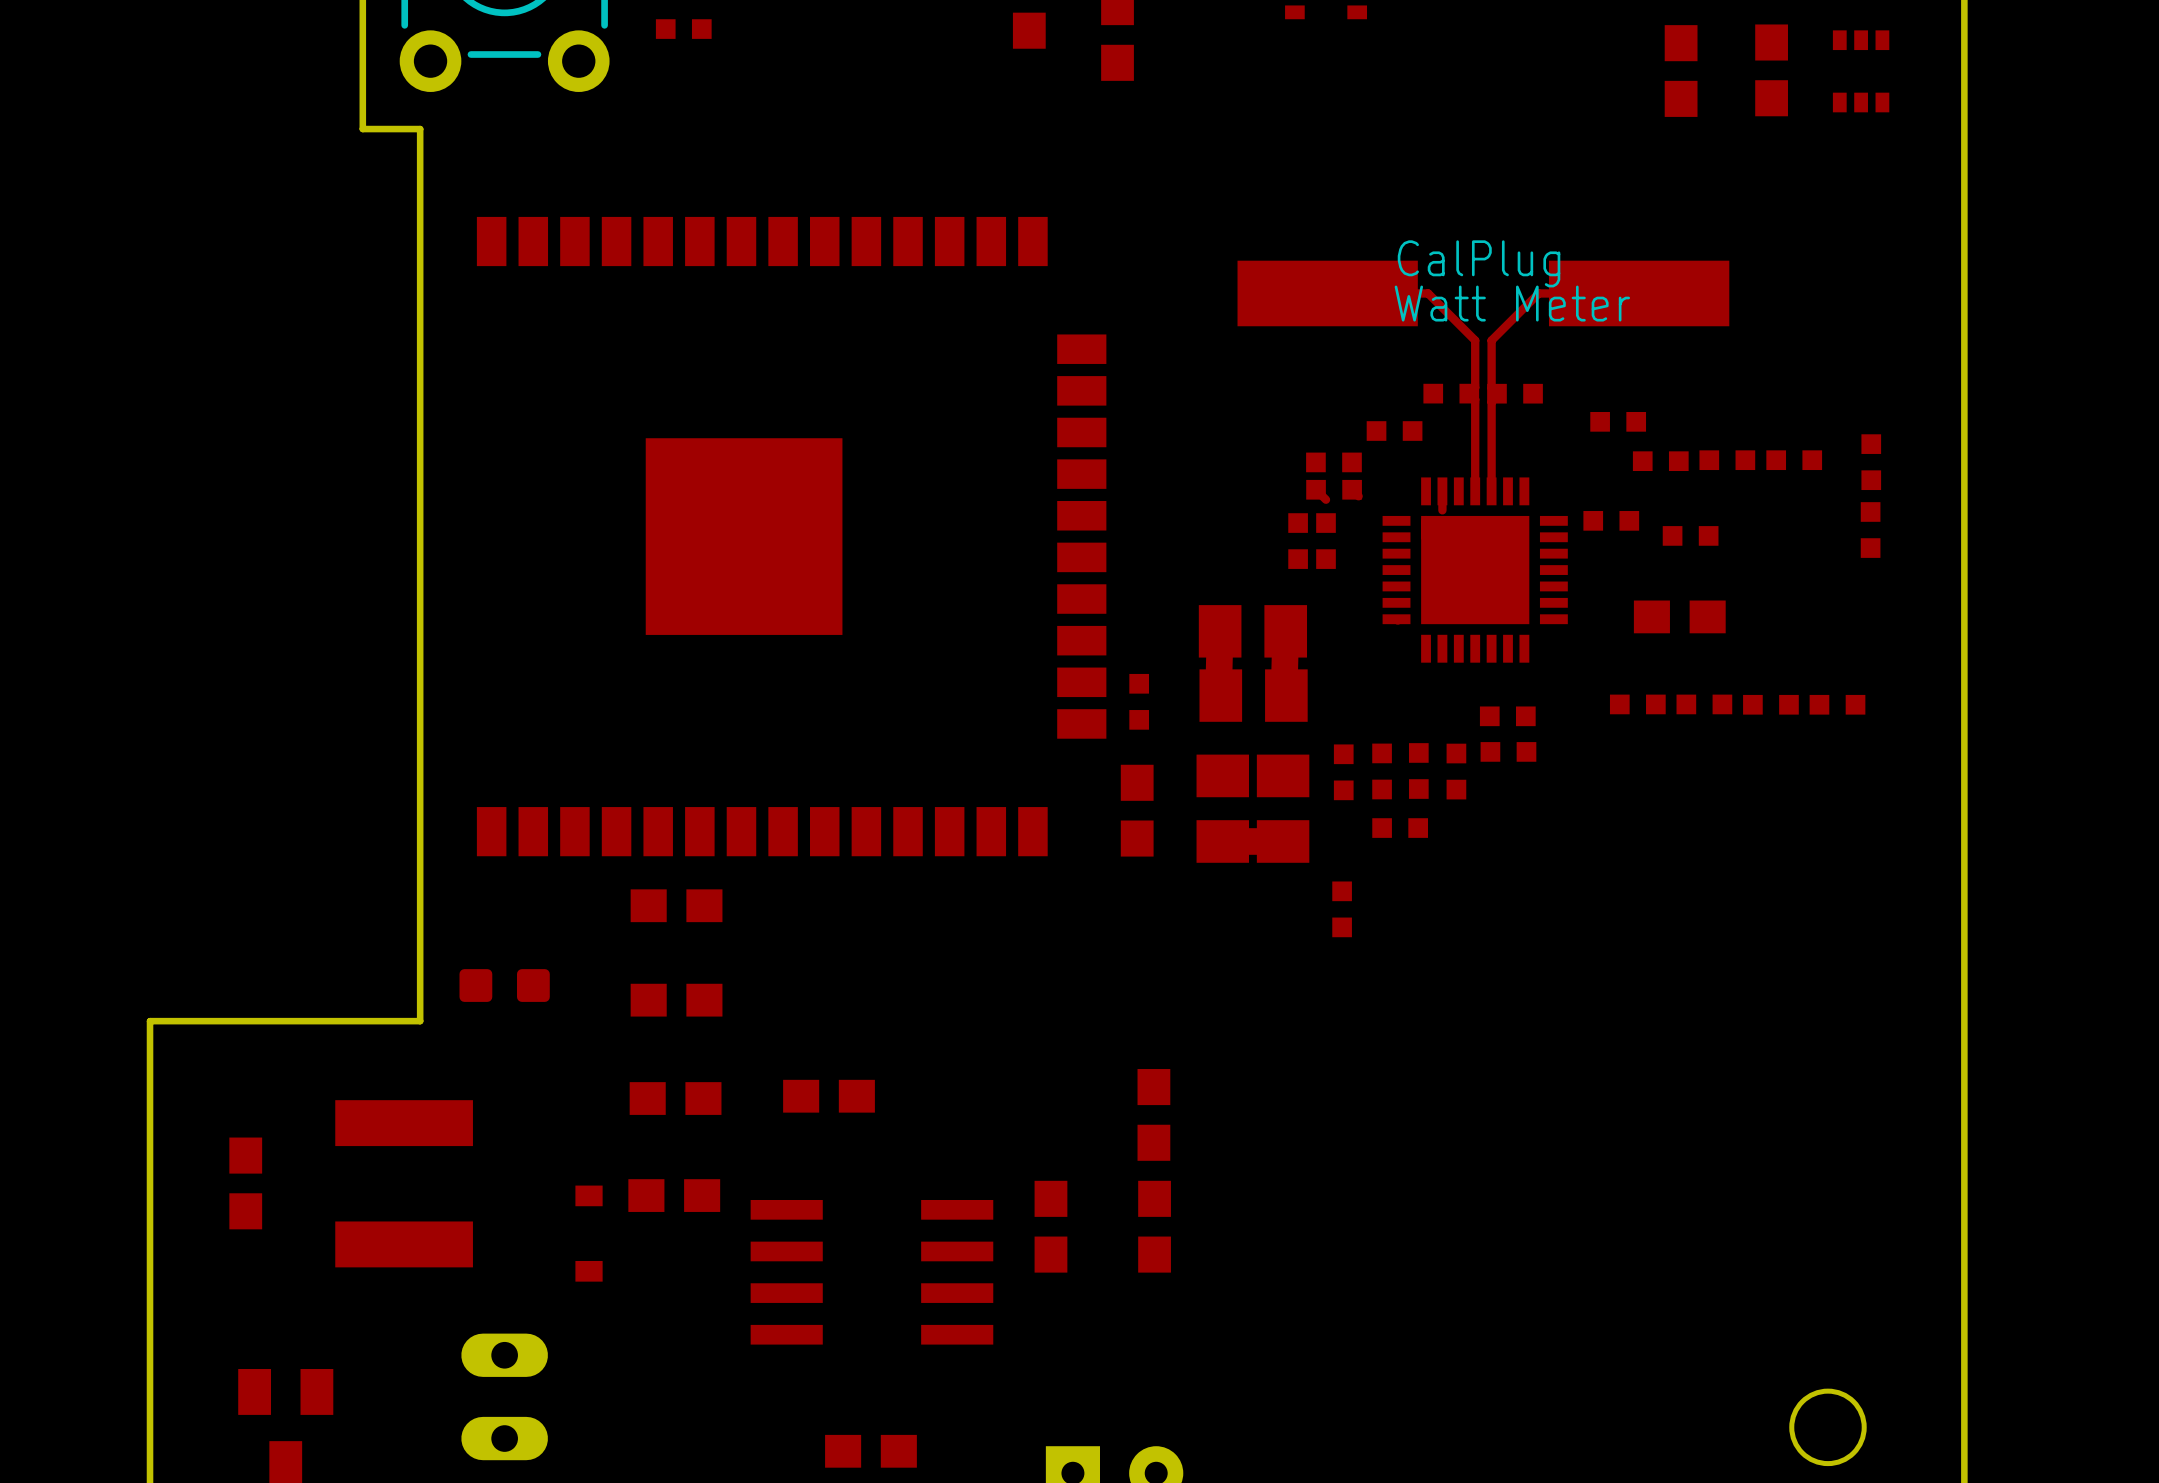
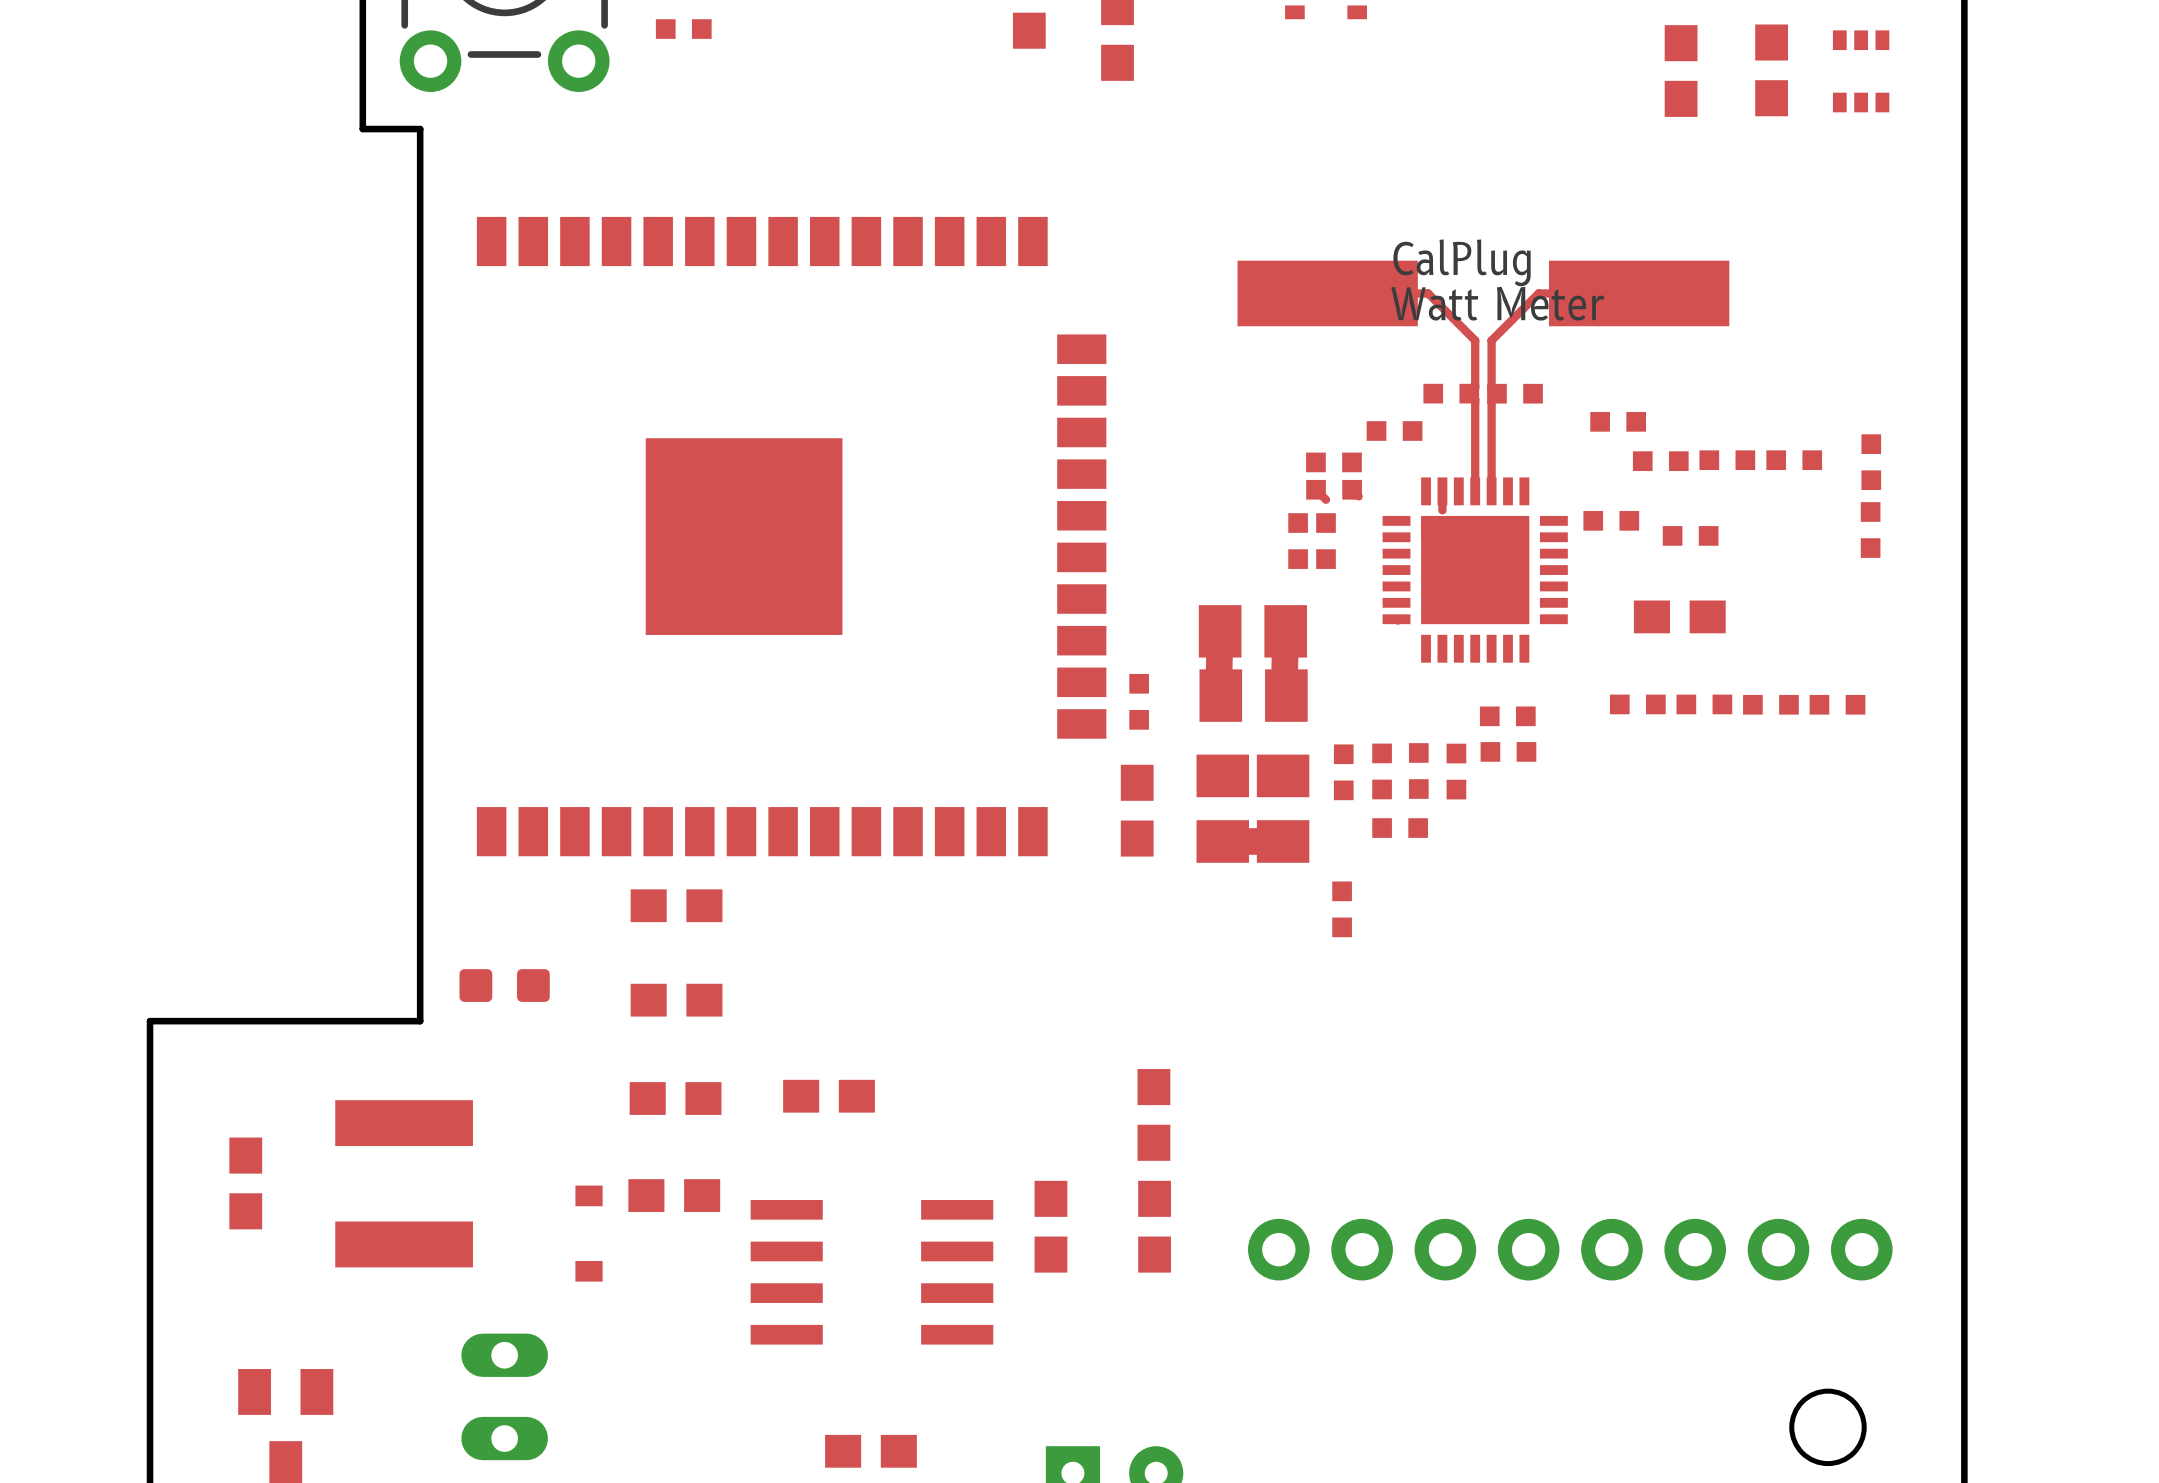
part: none -> (1570, 1249)

